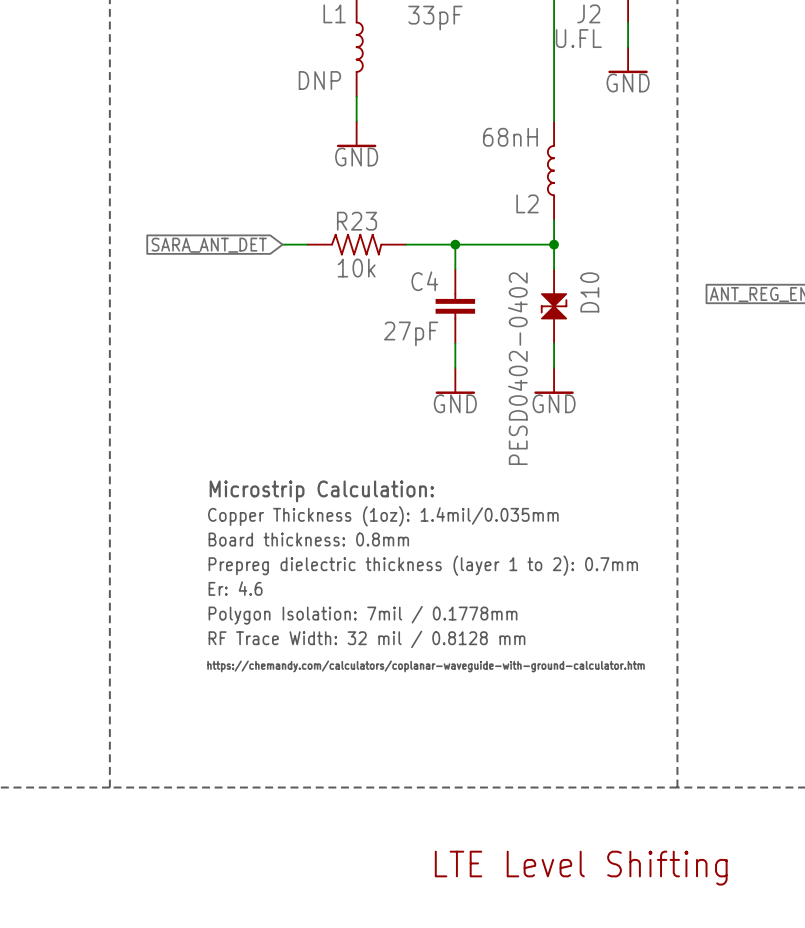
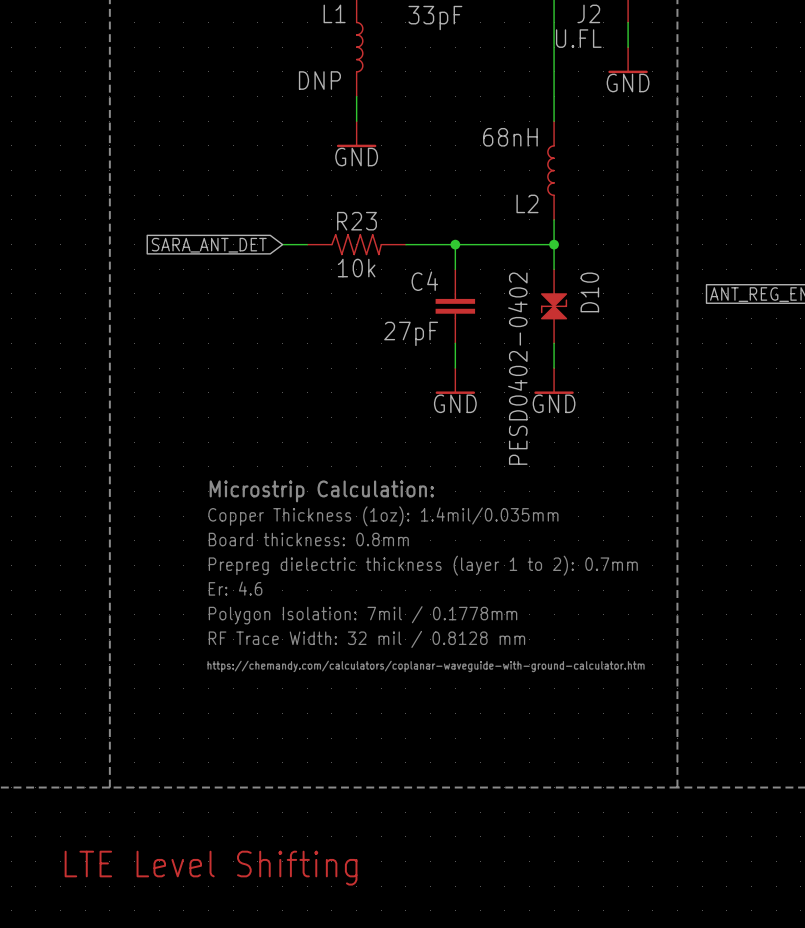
text: none -> LTE Level Shifting (211, 868)
text: LTE Level Shifting (581, 868) -> none

